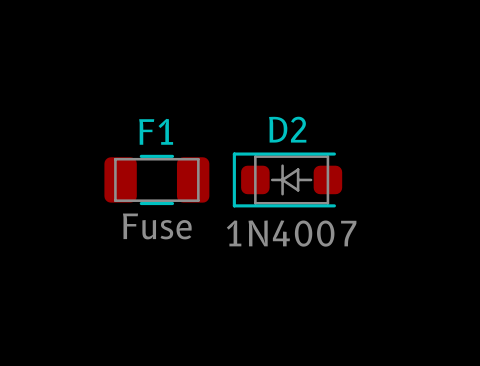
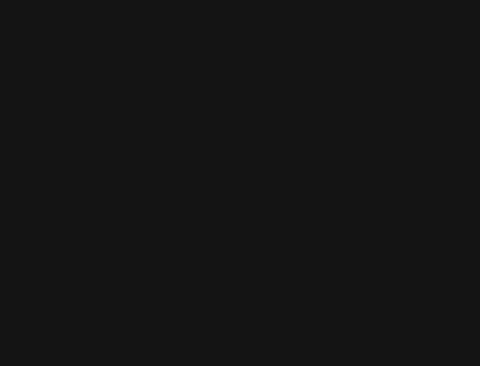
F1: Fuse (156, 179) -> none
D2: 1N4007 (287, 179) -> none

